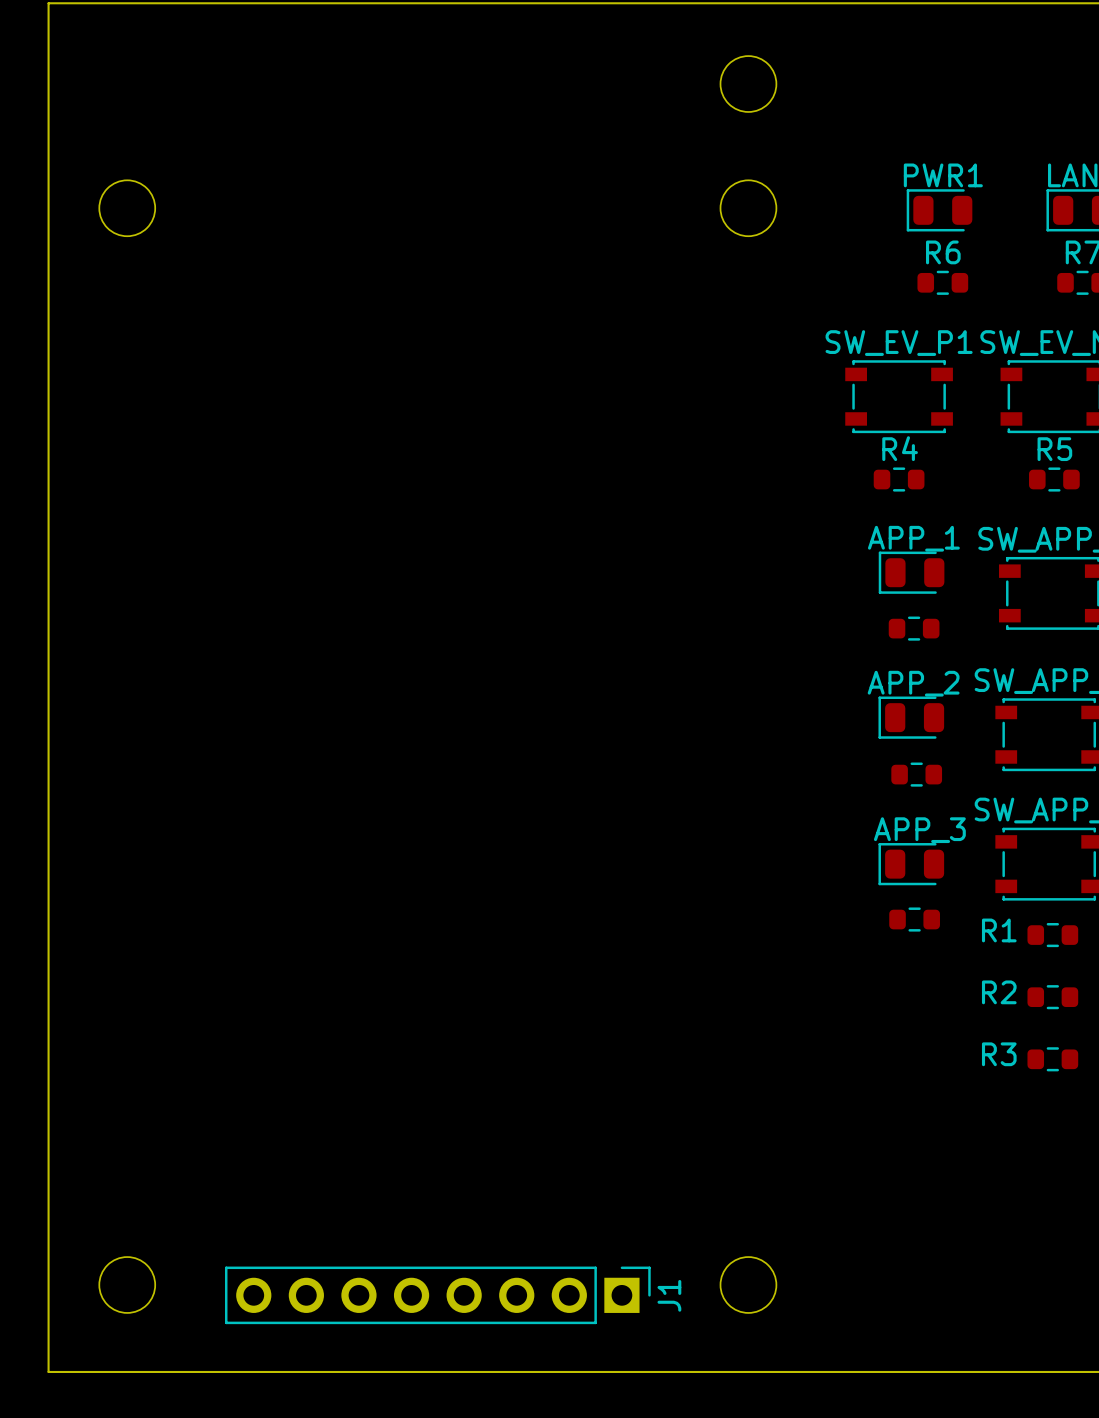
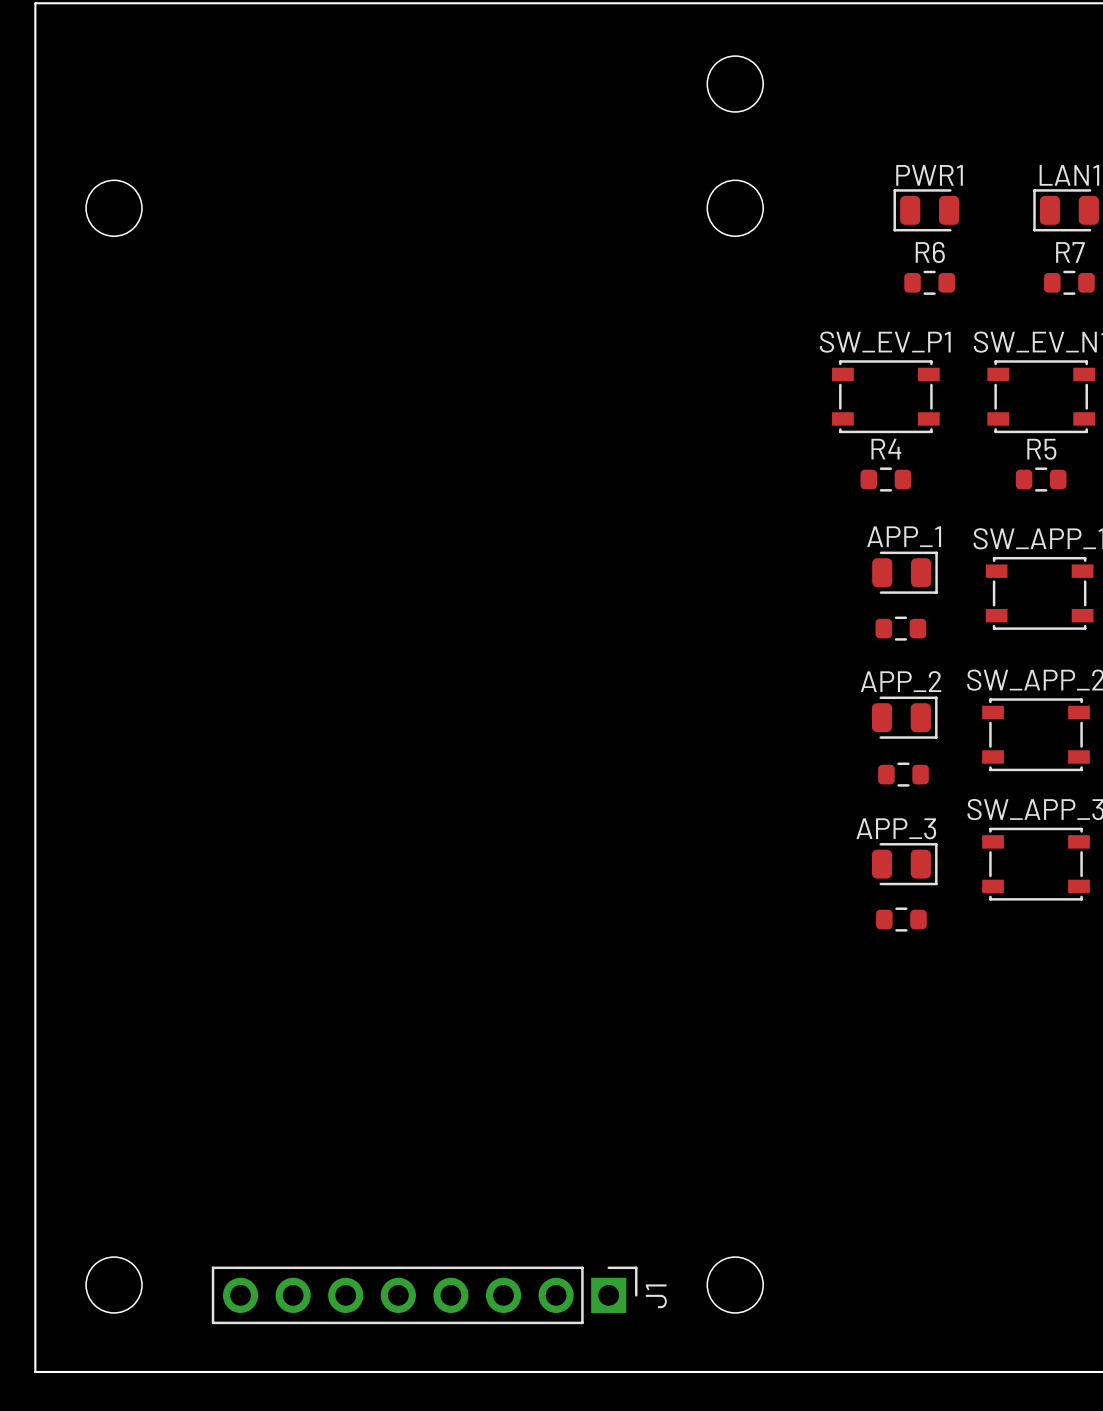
APP_1 rotation: 0° (911, 572) -> 180° (904, 572)
APP_2 rotation: 0° (911, 717) -> 180° (904, 717)
APP_3 rotation: 0° (911, 864) -> 180° (904, 864)
R1: (1052, 935) -> none
R2: (1052, 997) -> none
R3: (1052, 1059) -> none

